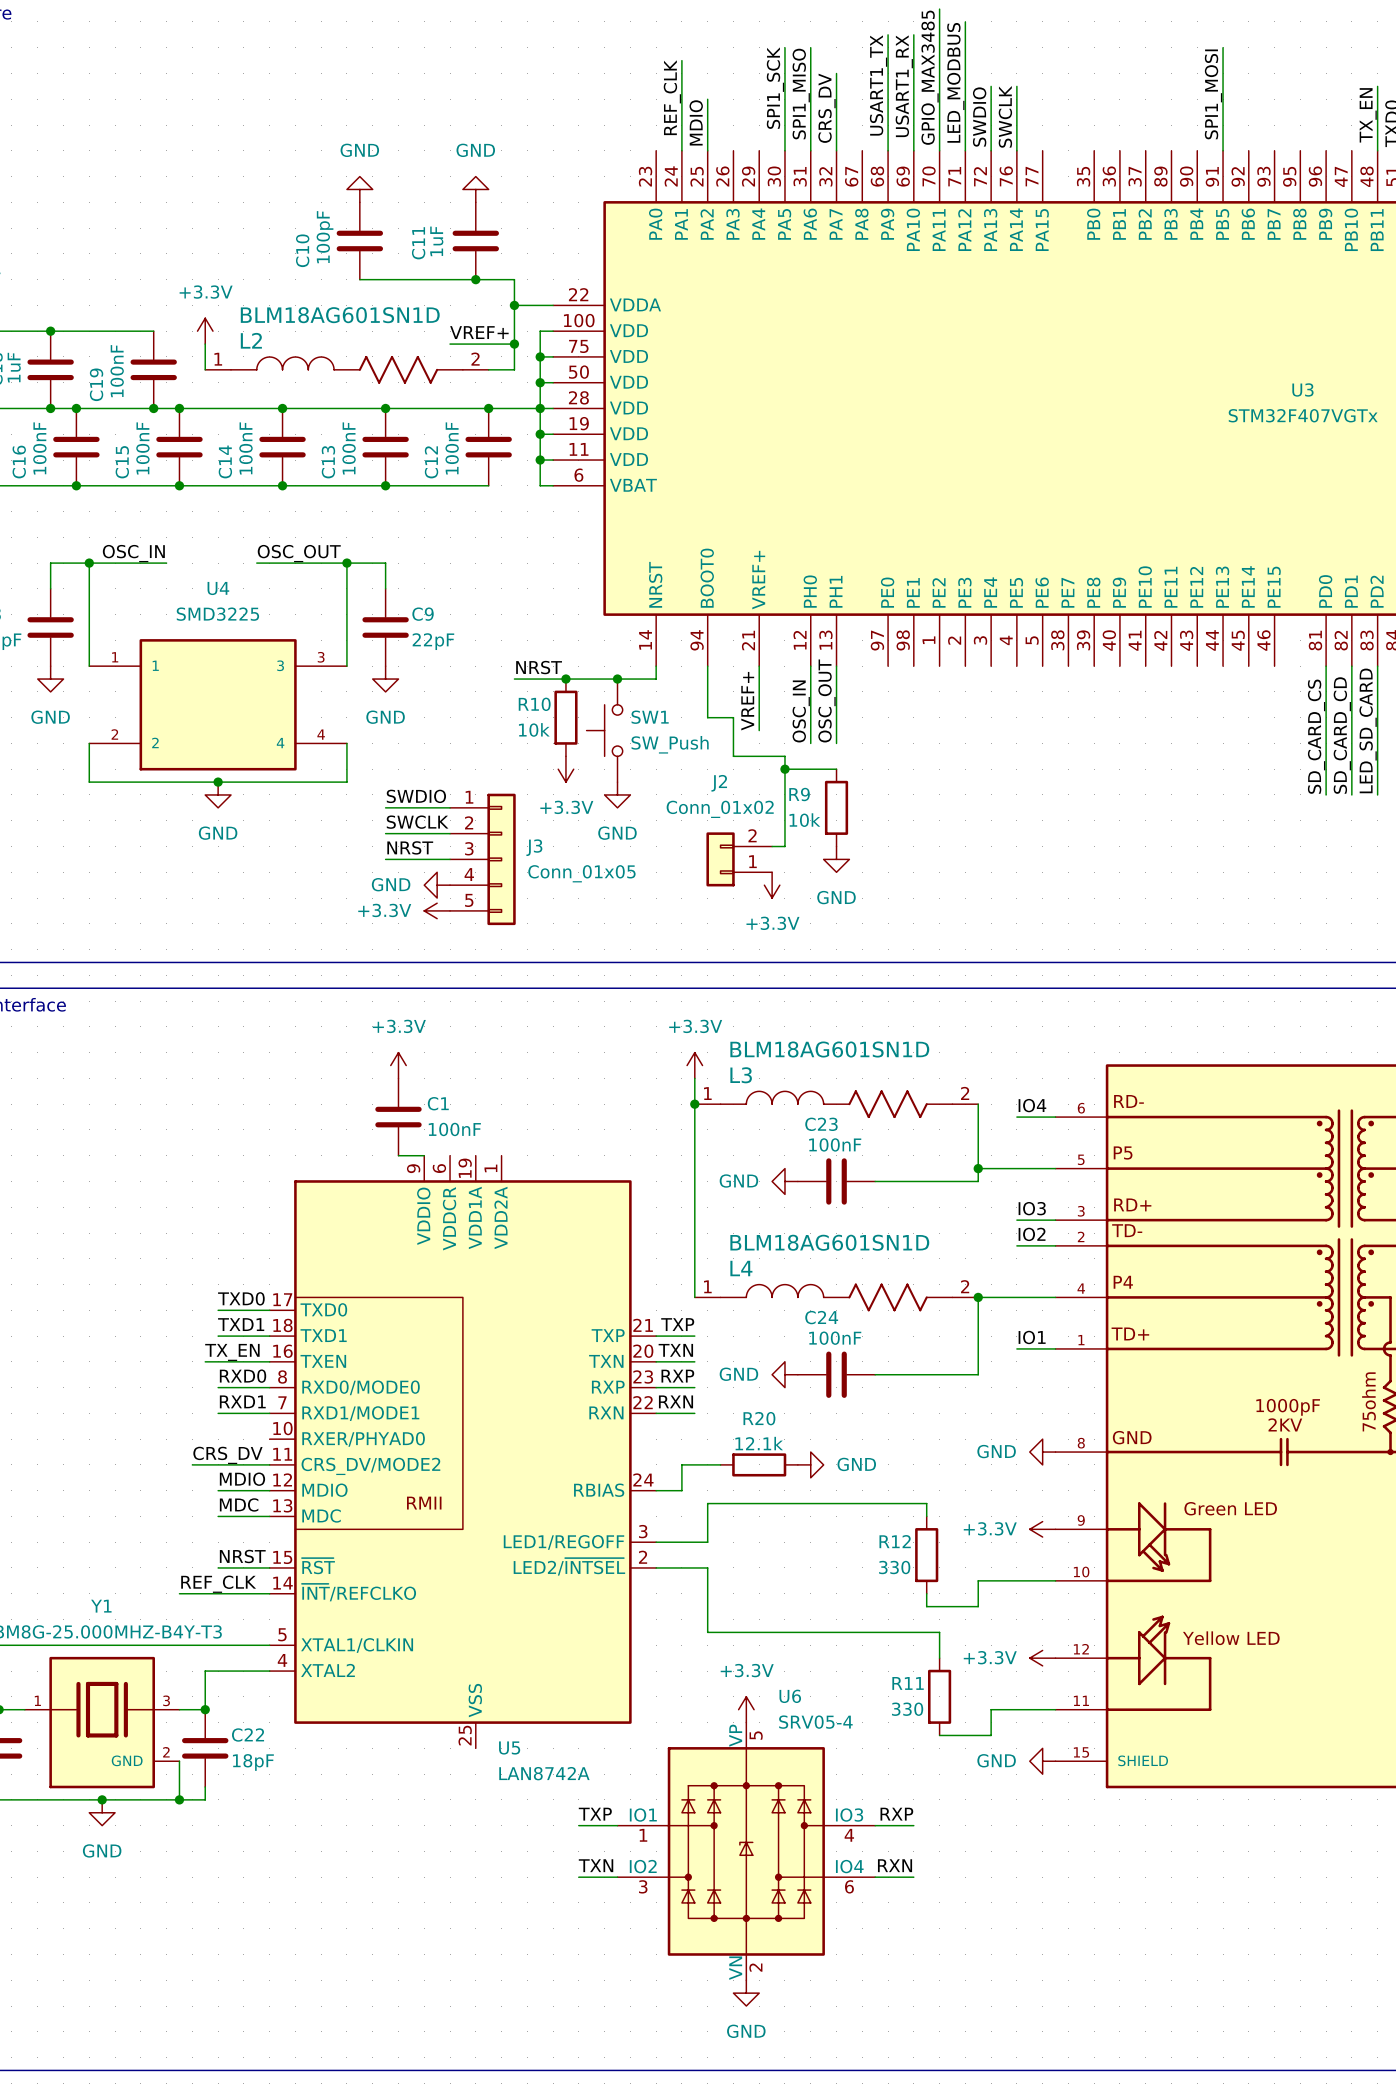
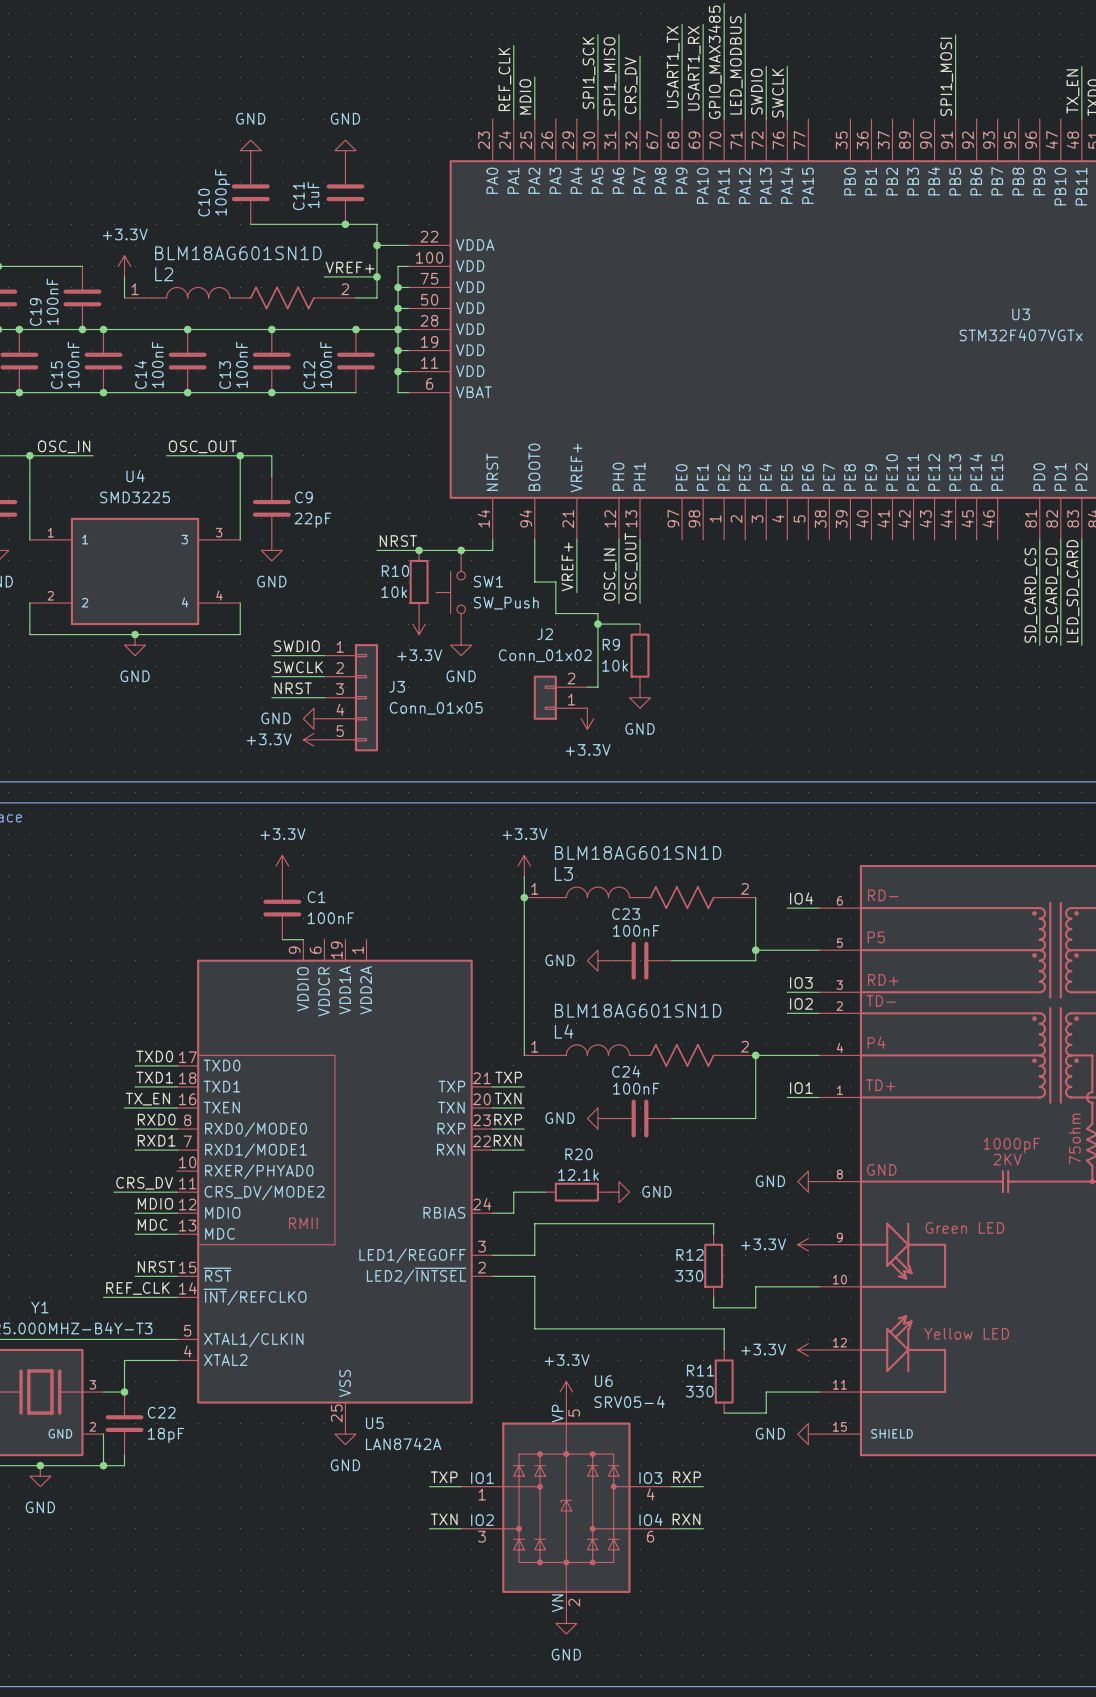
power symbol: none -> GND (345, 1434)

